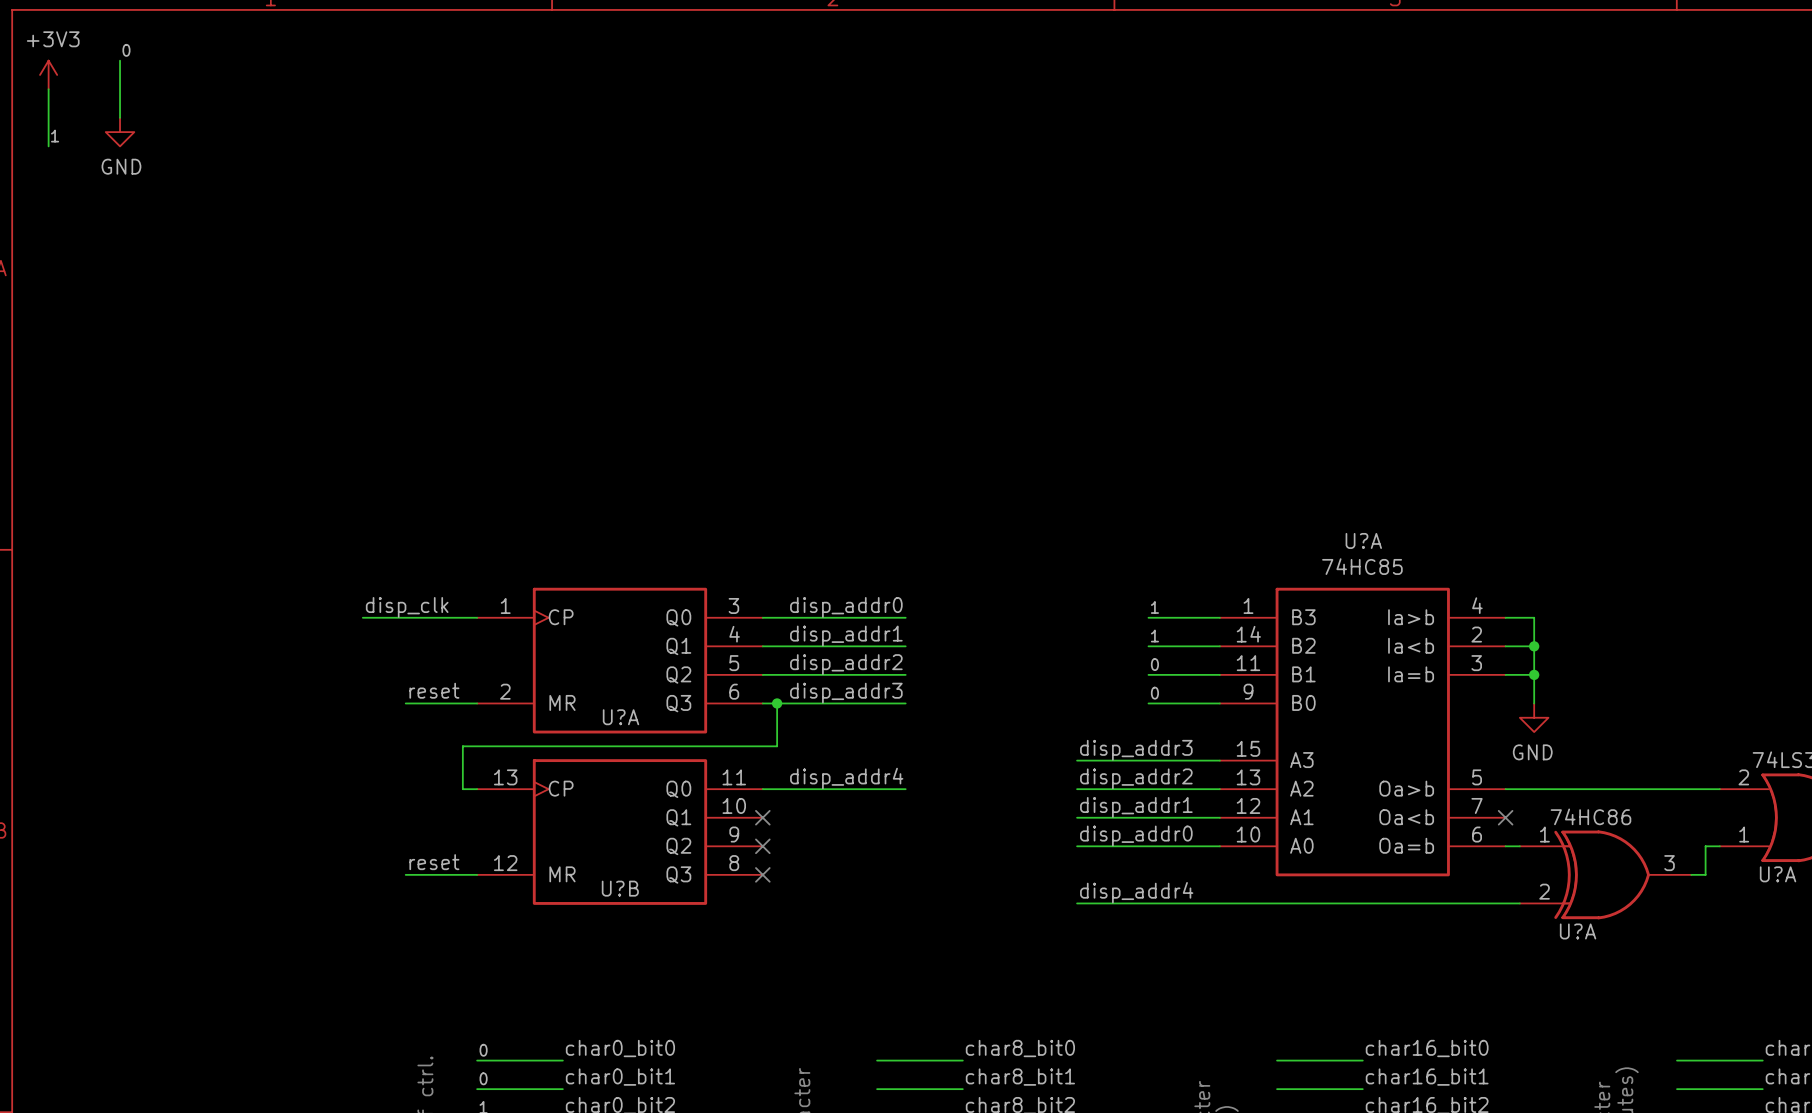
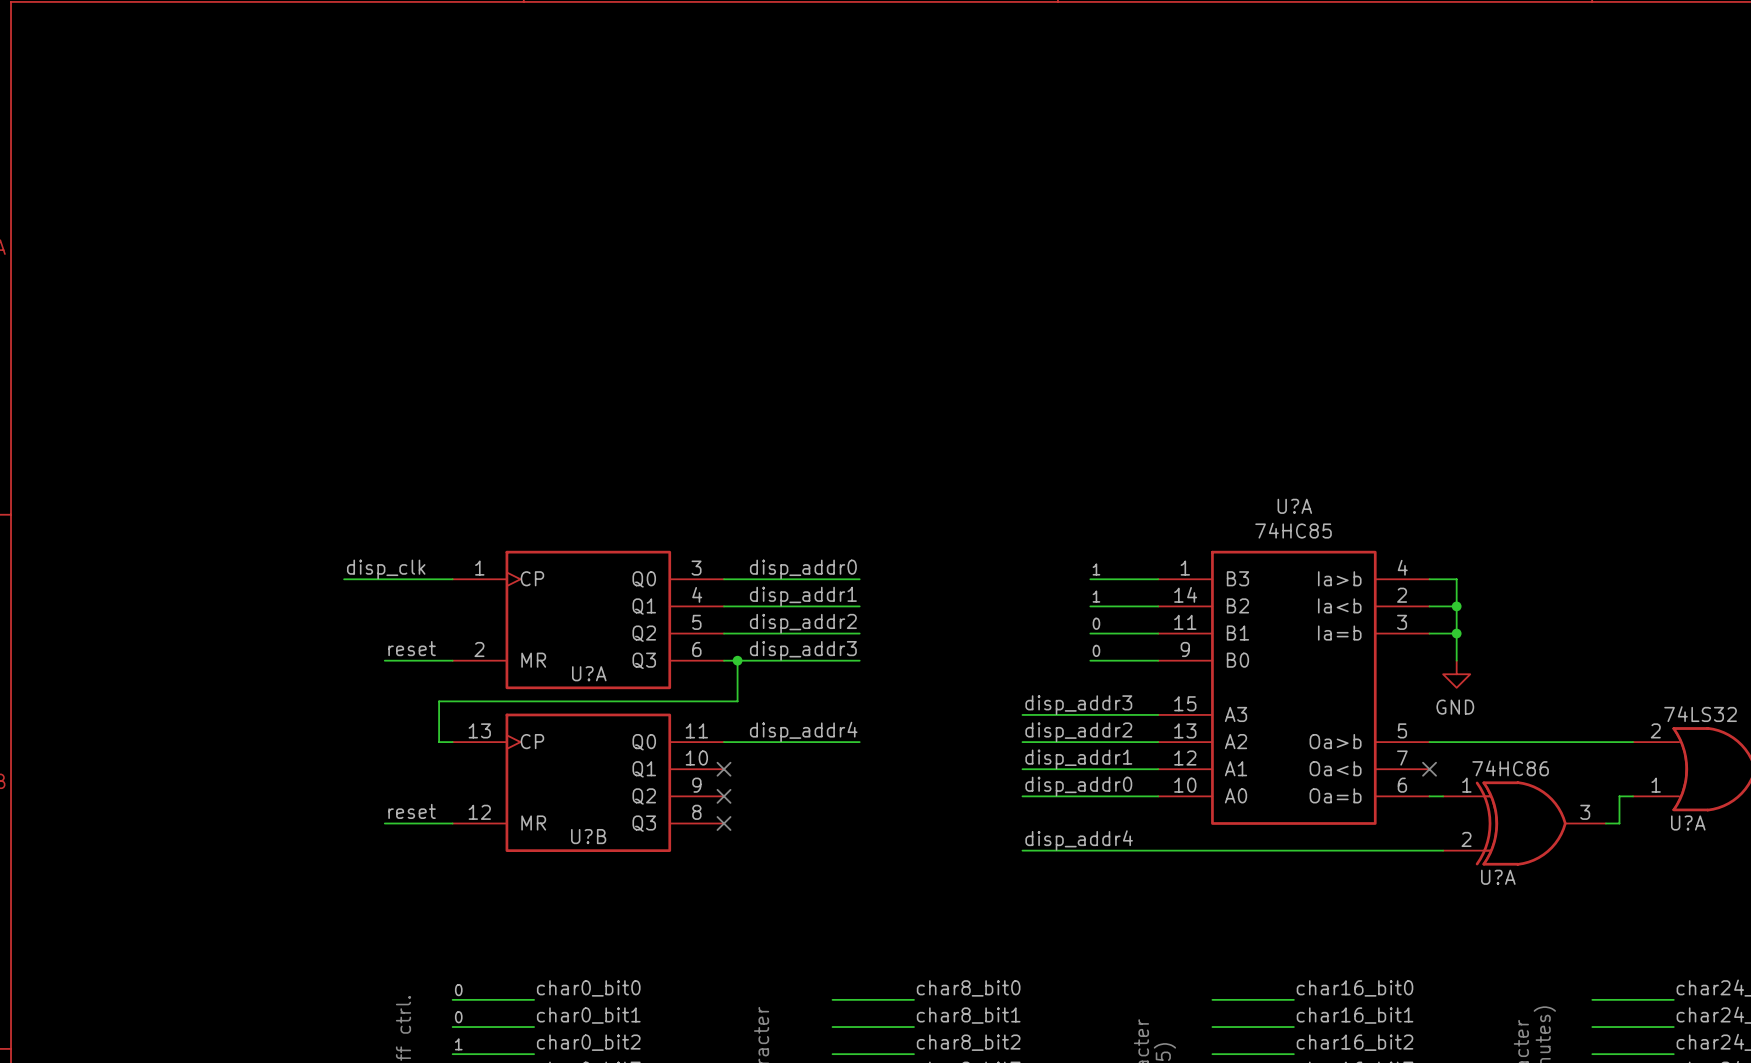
label: 0 (126, 50) -> none
wire: (120, 60) (120, 117) -> none
power symbol: +3V3 (48, 74) -> none
wire: (48, 89) (48, 146) -> none
power symbol: GND (120, 132) -> none
label: 1 (55, 136) -> none

